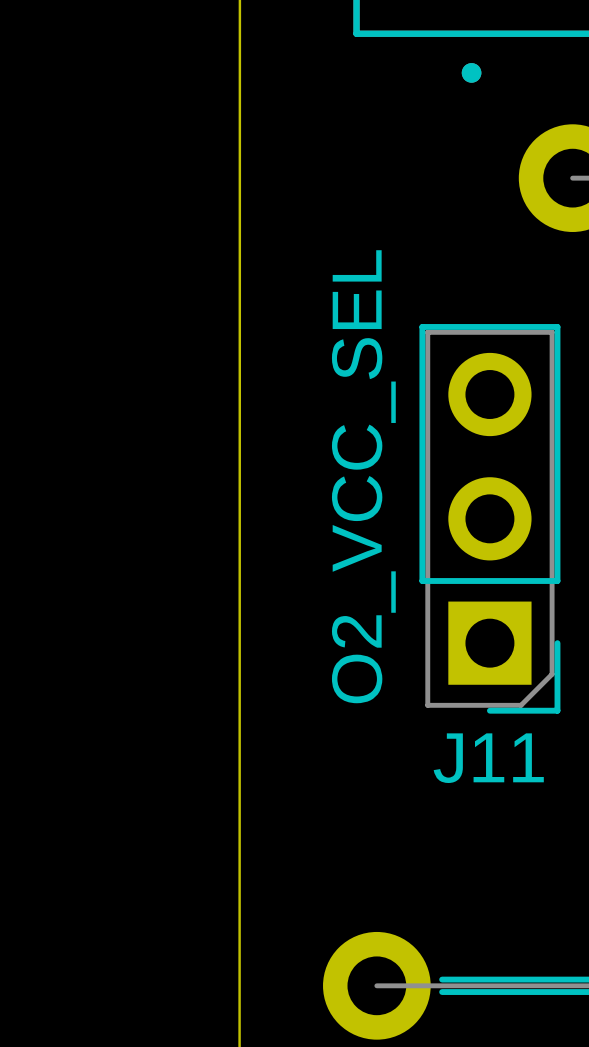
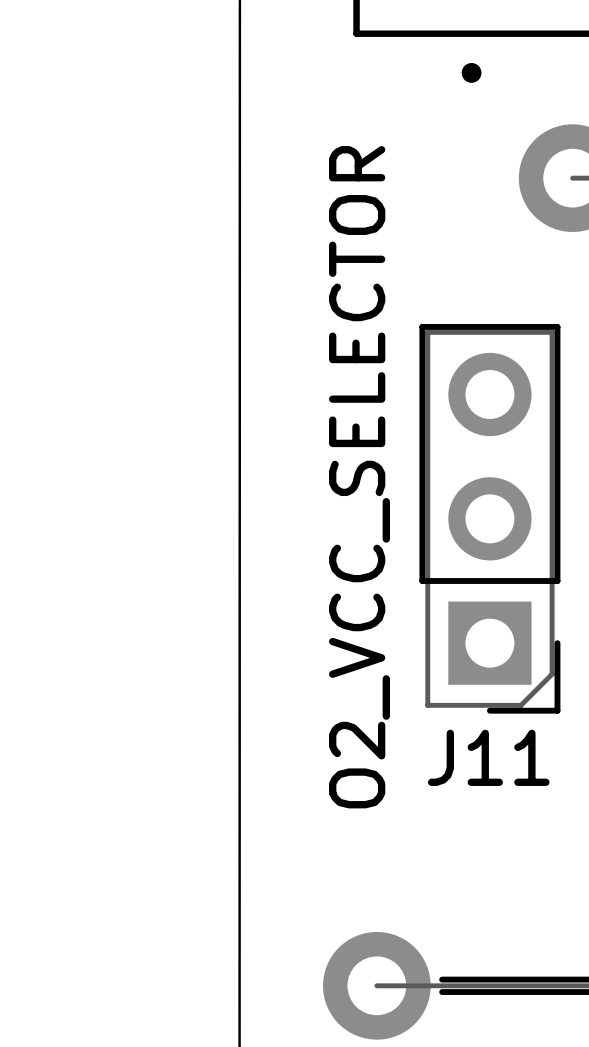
J11 value: O2_VCC_SEL (363, 476) -> O2_VCC_SELECTOR (359, 477)

